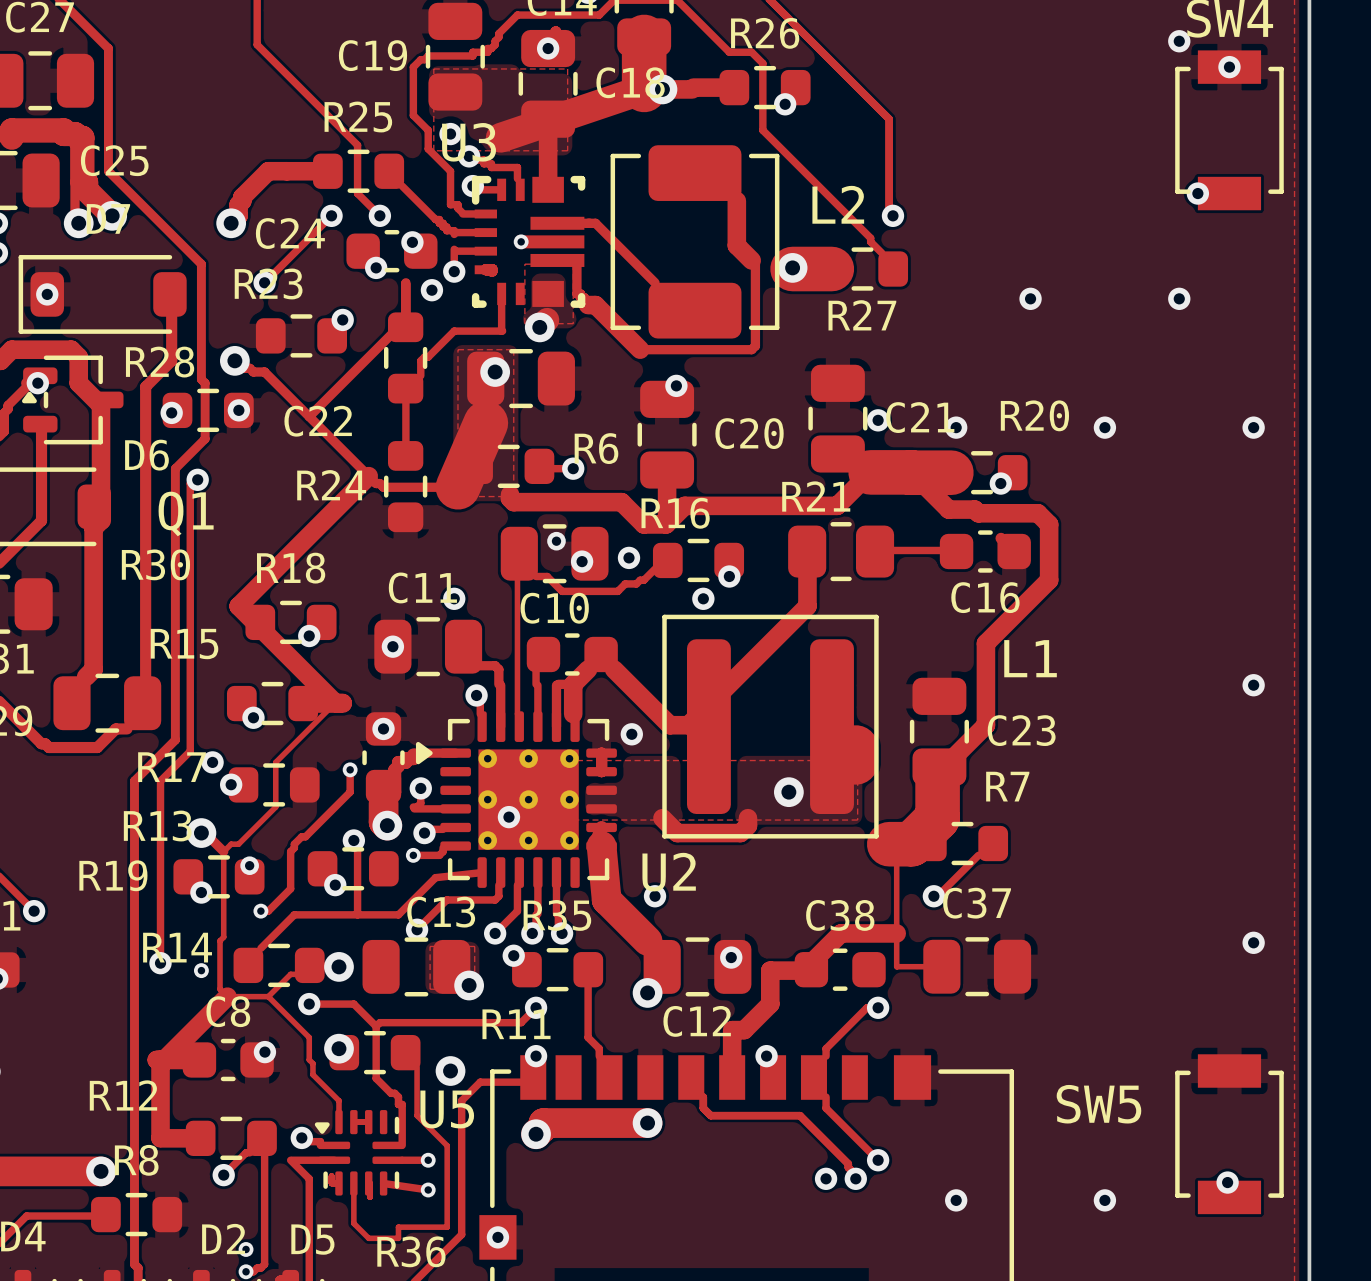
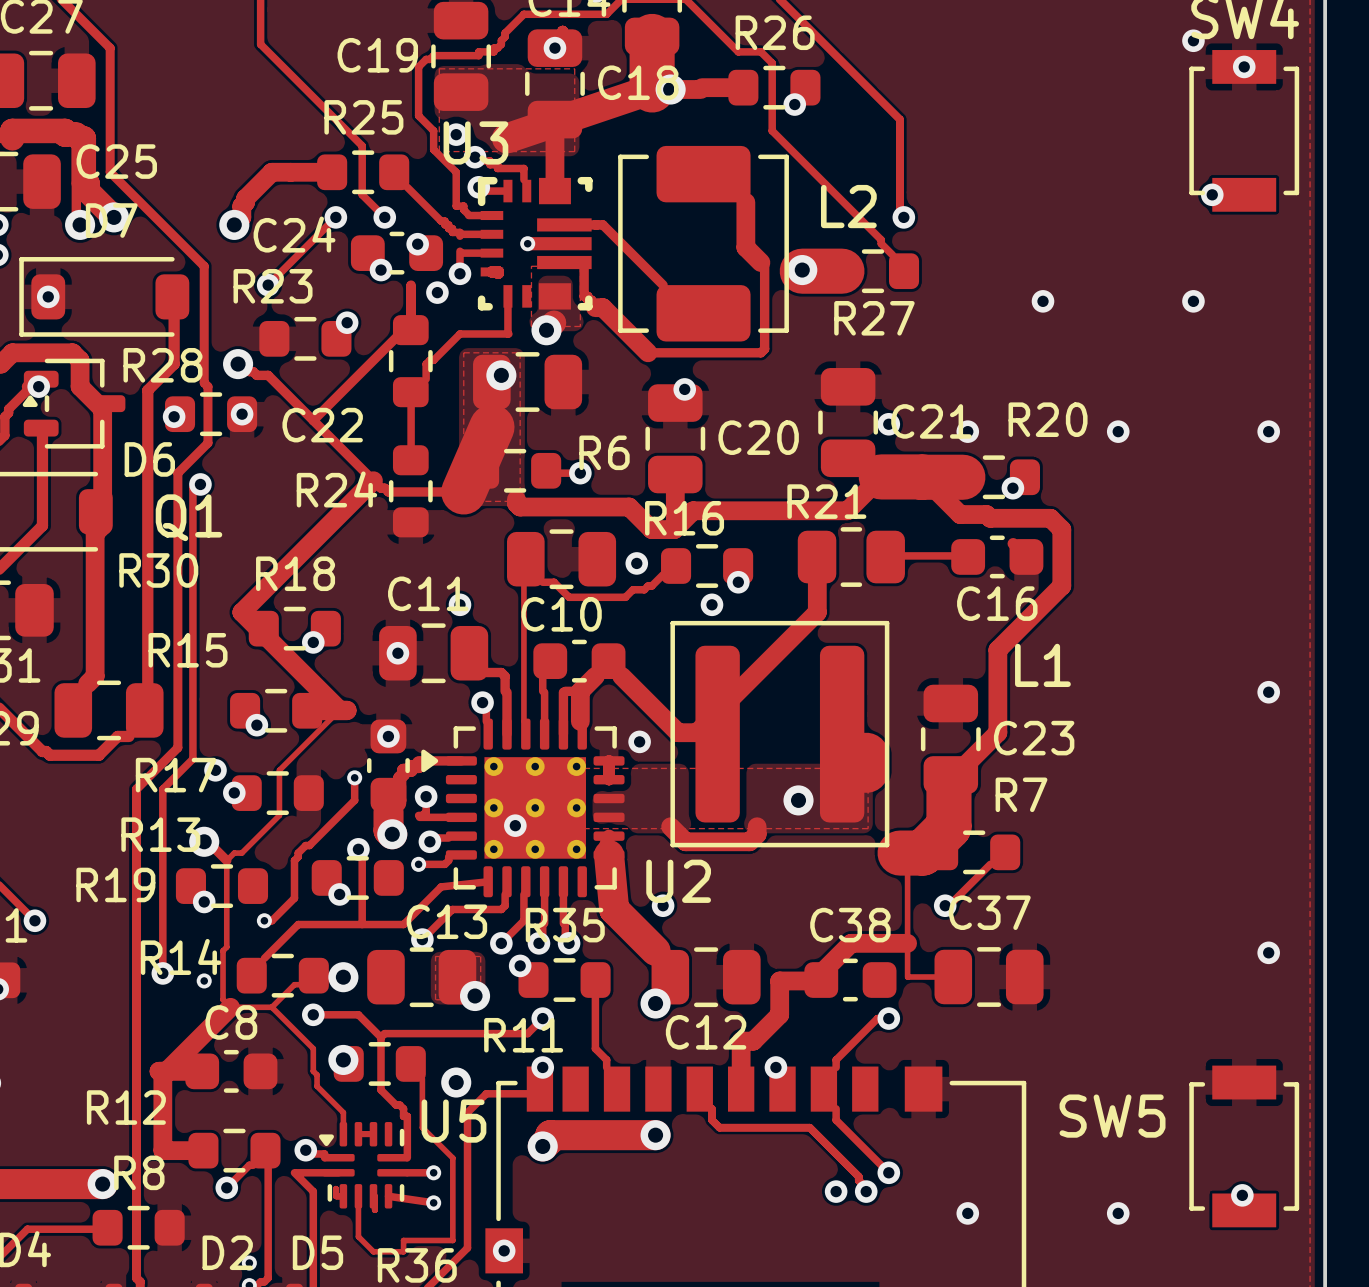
via: (556, 541) -> none
via: (582, 561) -> none
via: (249, 865) -> none
via: (731, 957) -> none
via: (264, 1052) -> none

